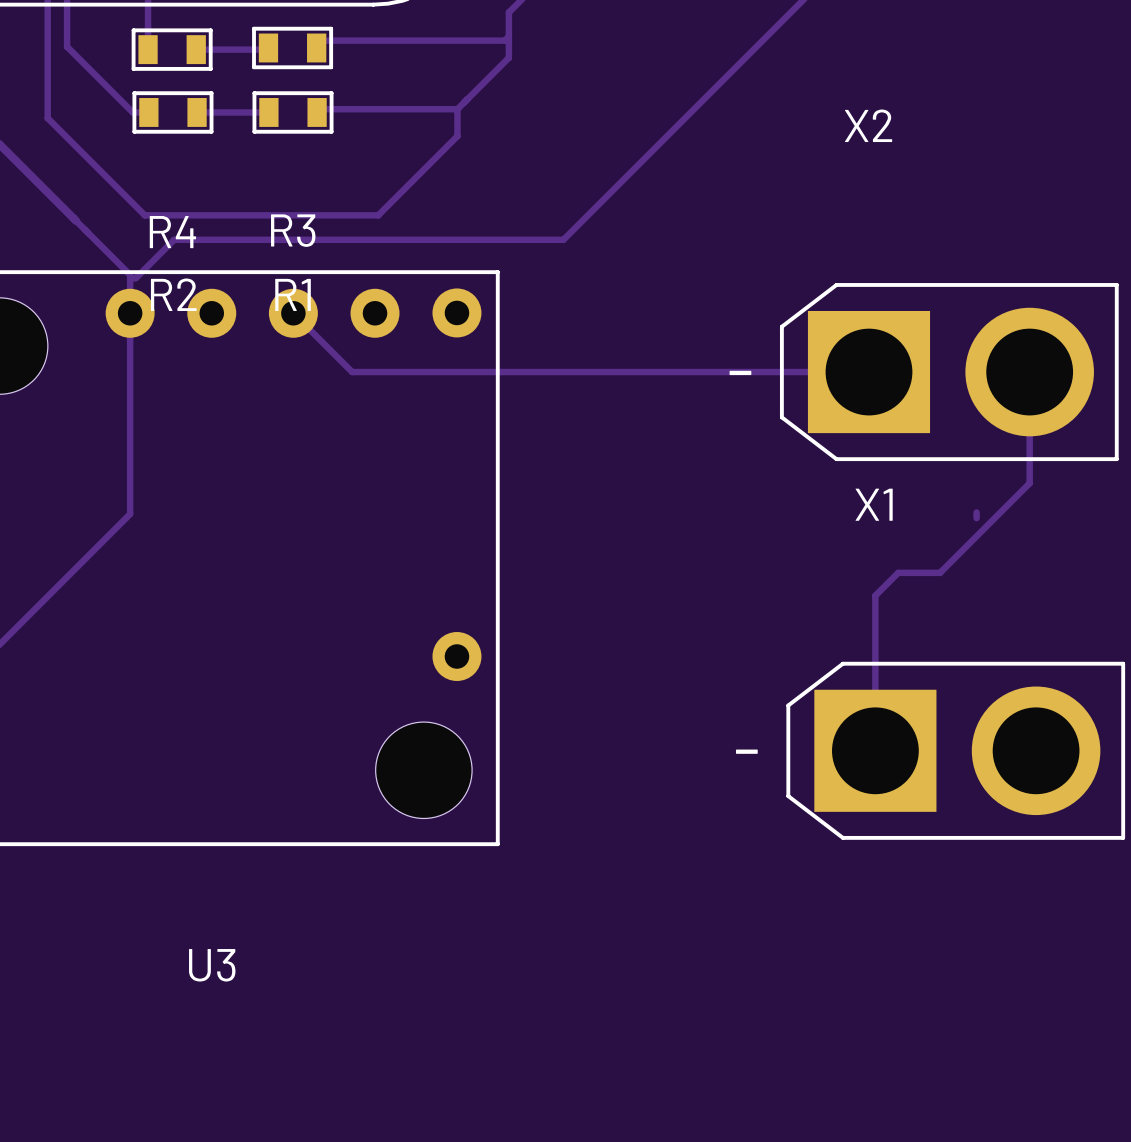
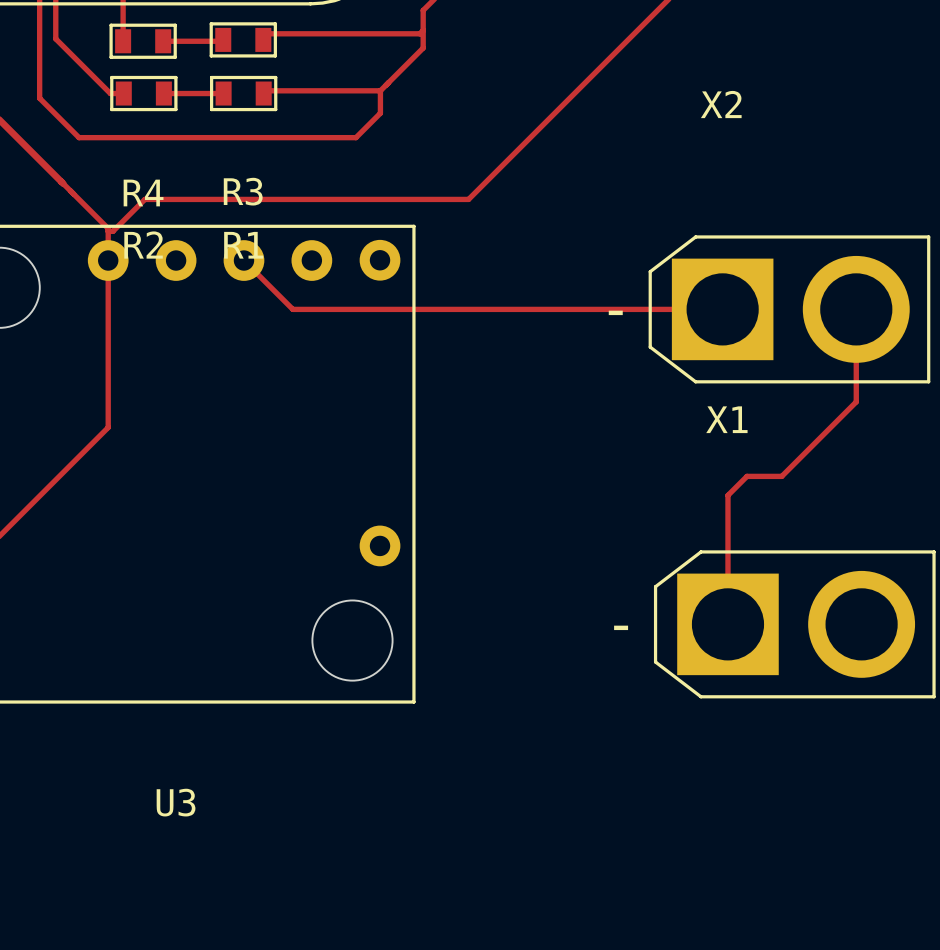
track: (95, 165) (144, 215) (378, 215) (428, 165) -> (79, 137) (355, 137)
track: (976, 512) (976, 518) -> none

